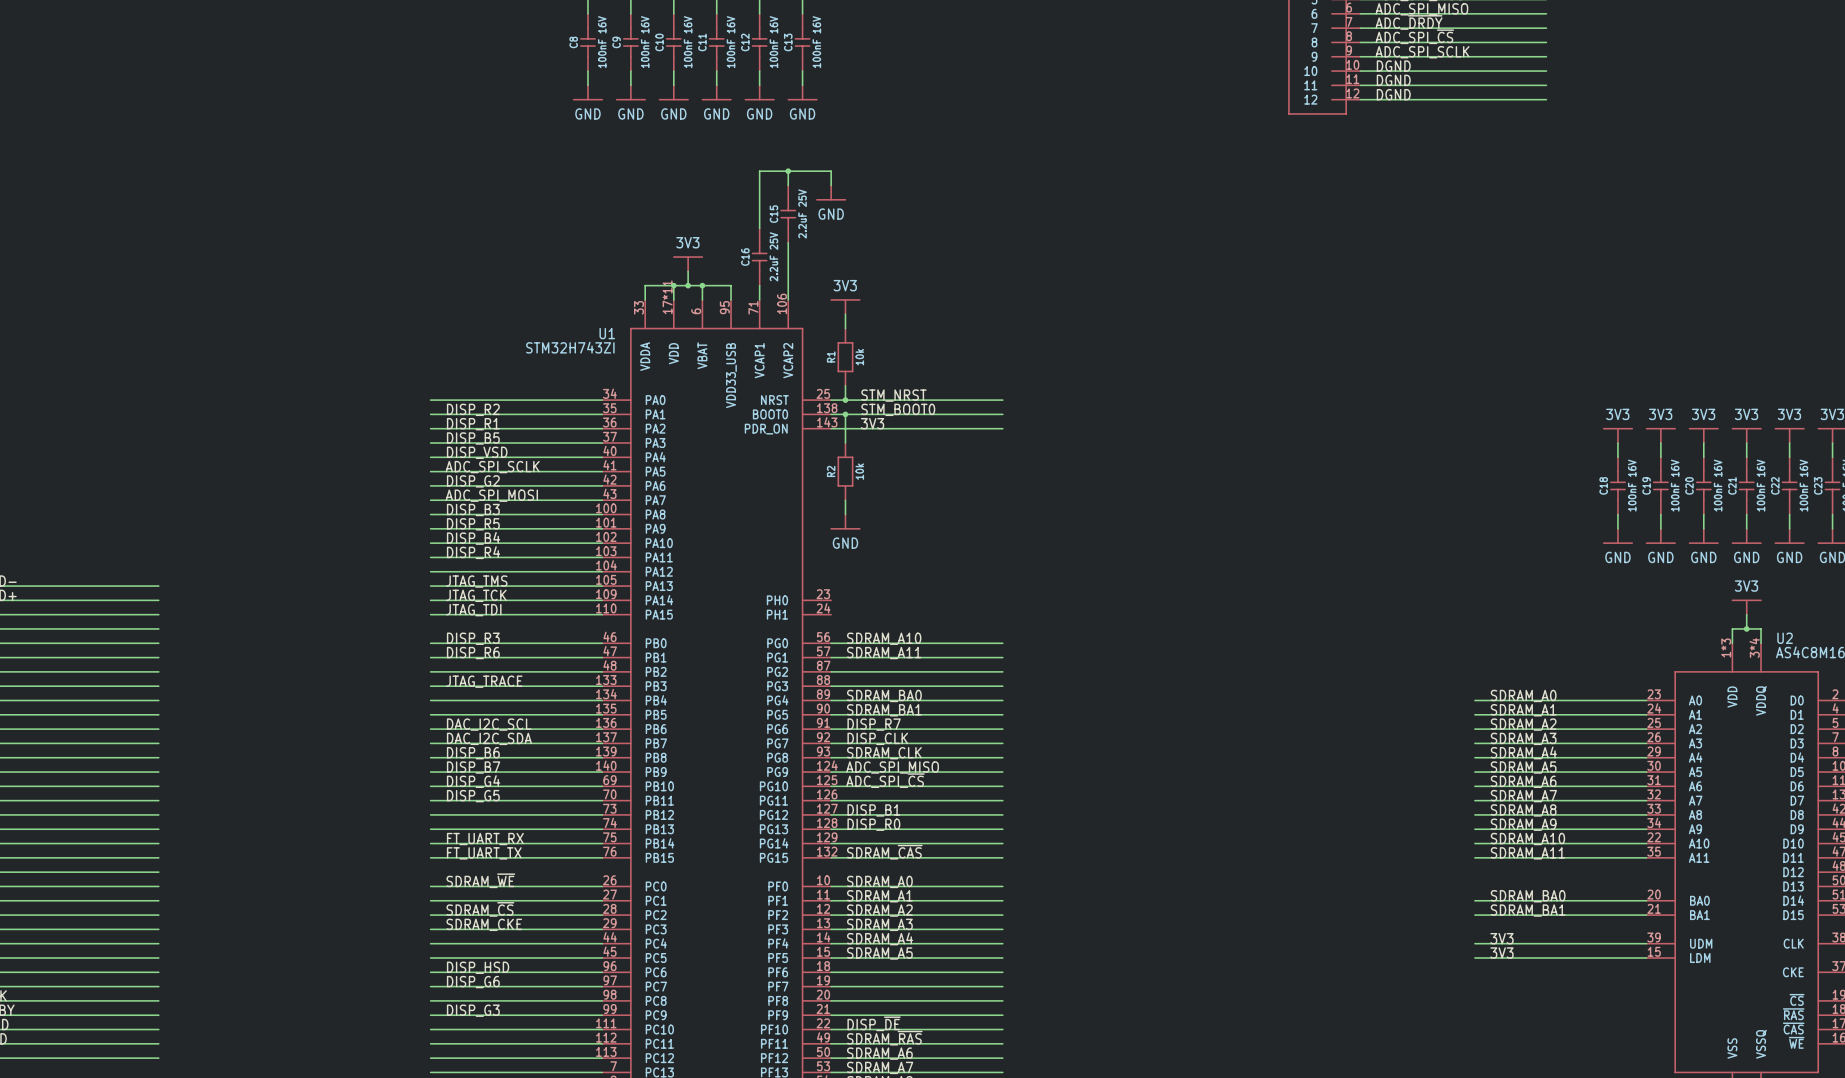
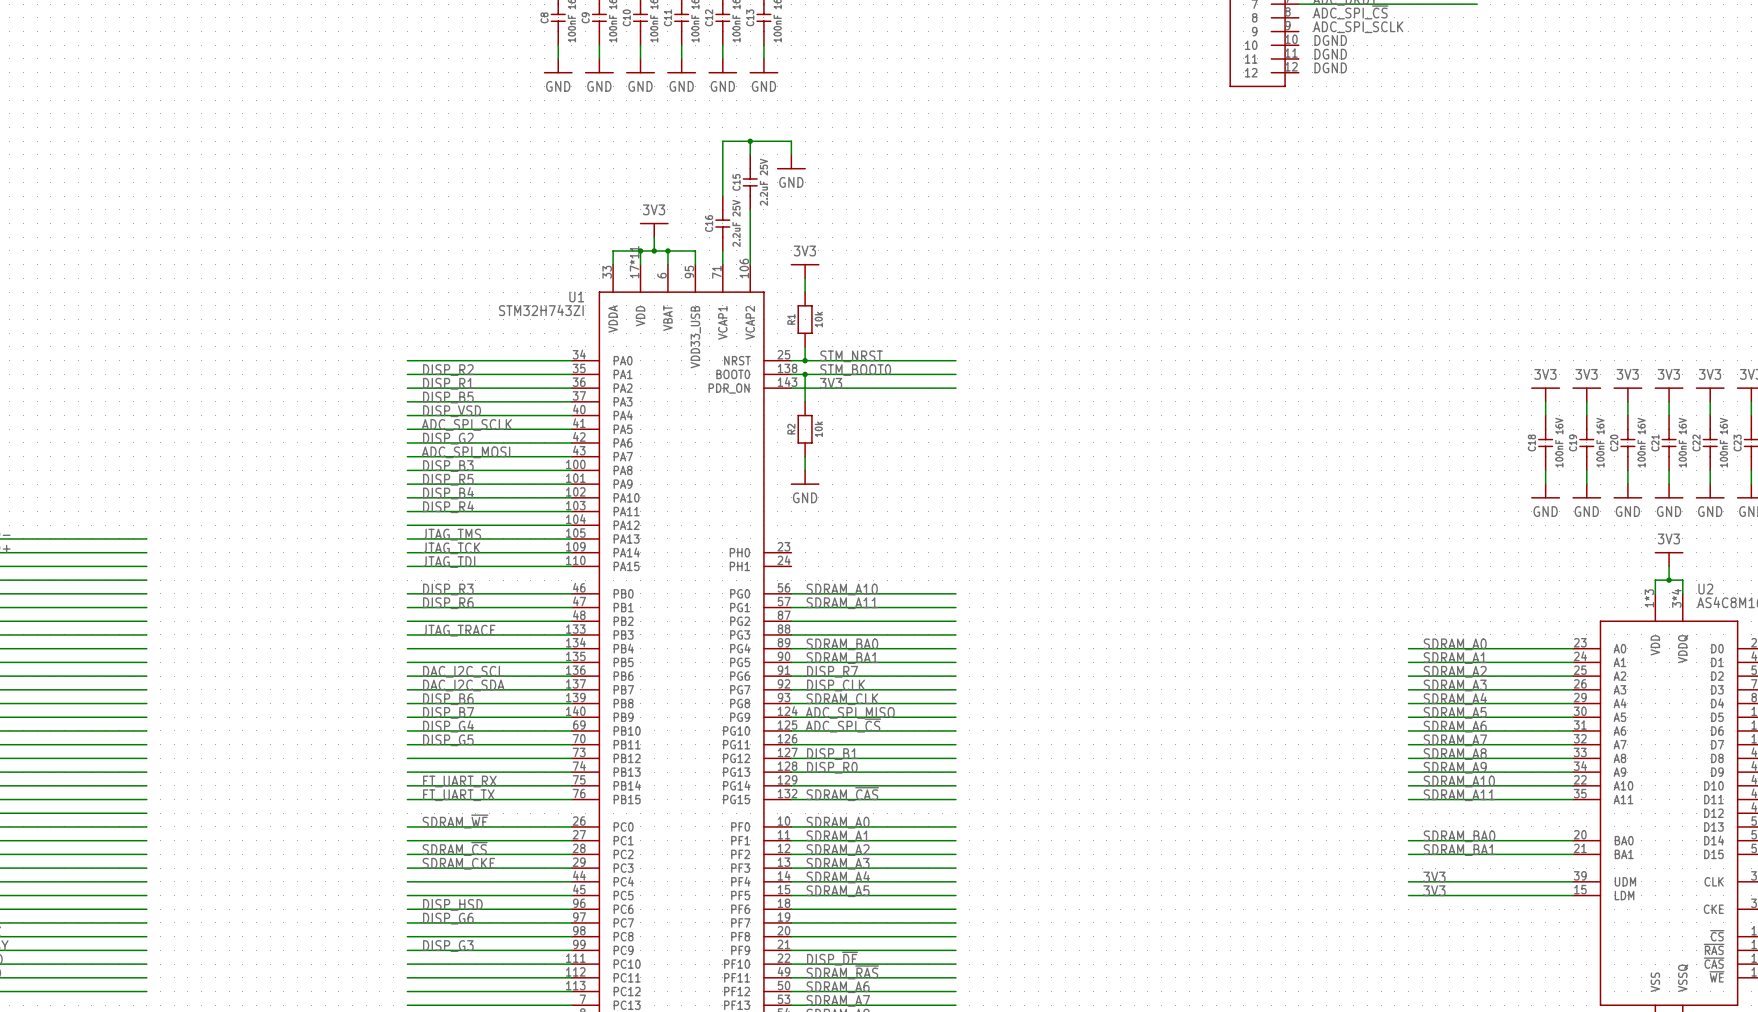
wire: (1360, 42) (1546, 42) -> none
wire: (1360, 56) (1546, 56) -> none
wire: (1360, 71) (1546, 71) -> none
wire: (1360, 85) (1546, 85) -> none
wire: (1360, 99) (1546, 99) -> none

